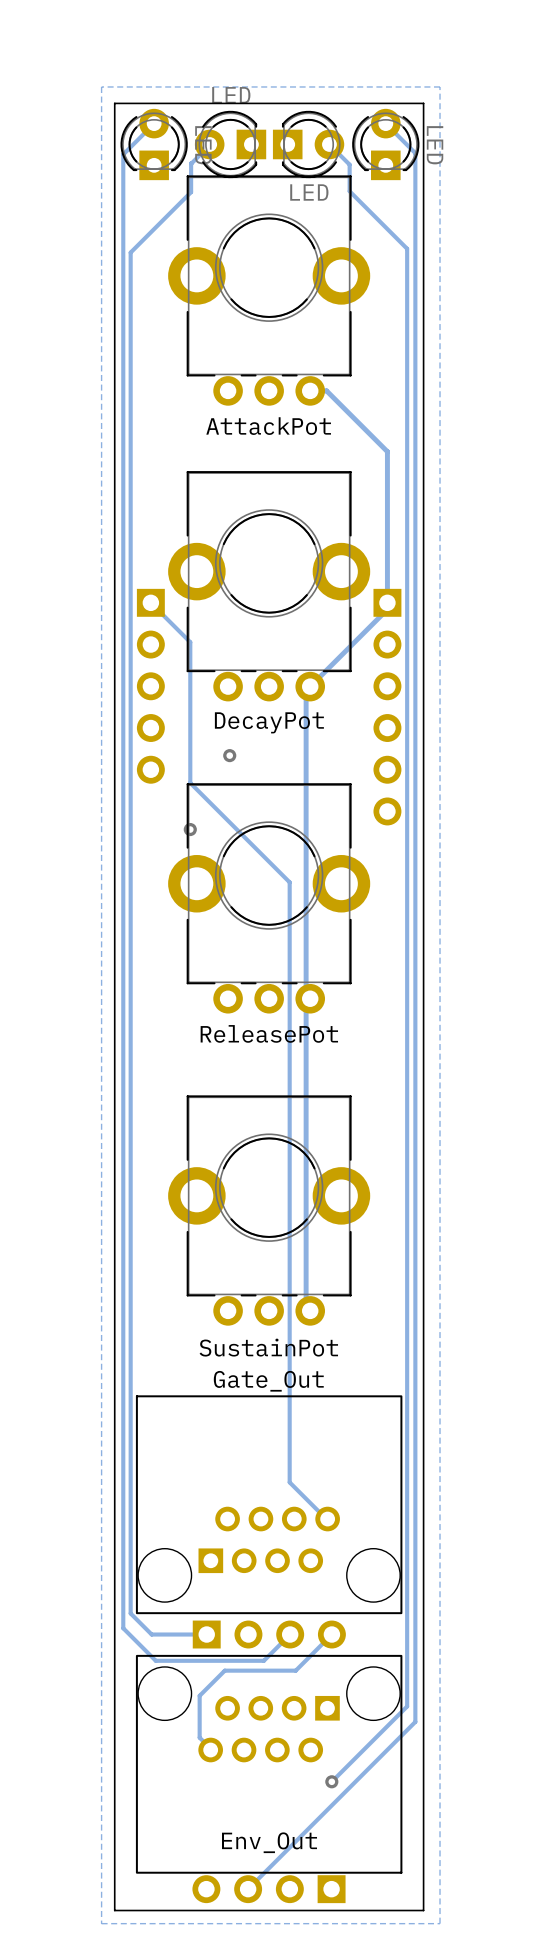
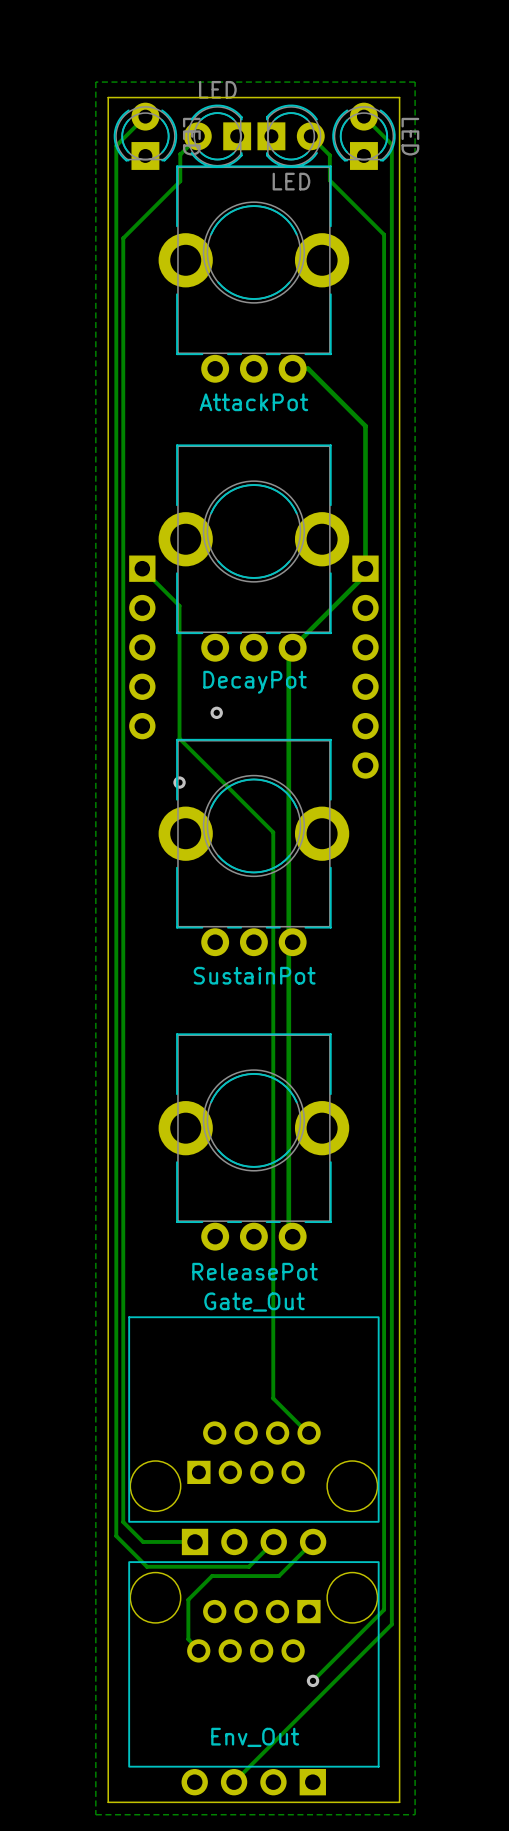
part value: ReleasePot (269, 1033) -> SustainPot (254, 975)
part value: SustainPot (268, 1347) -> ReleasePot (255, 1271)

